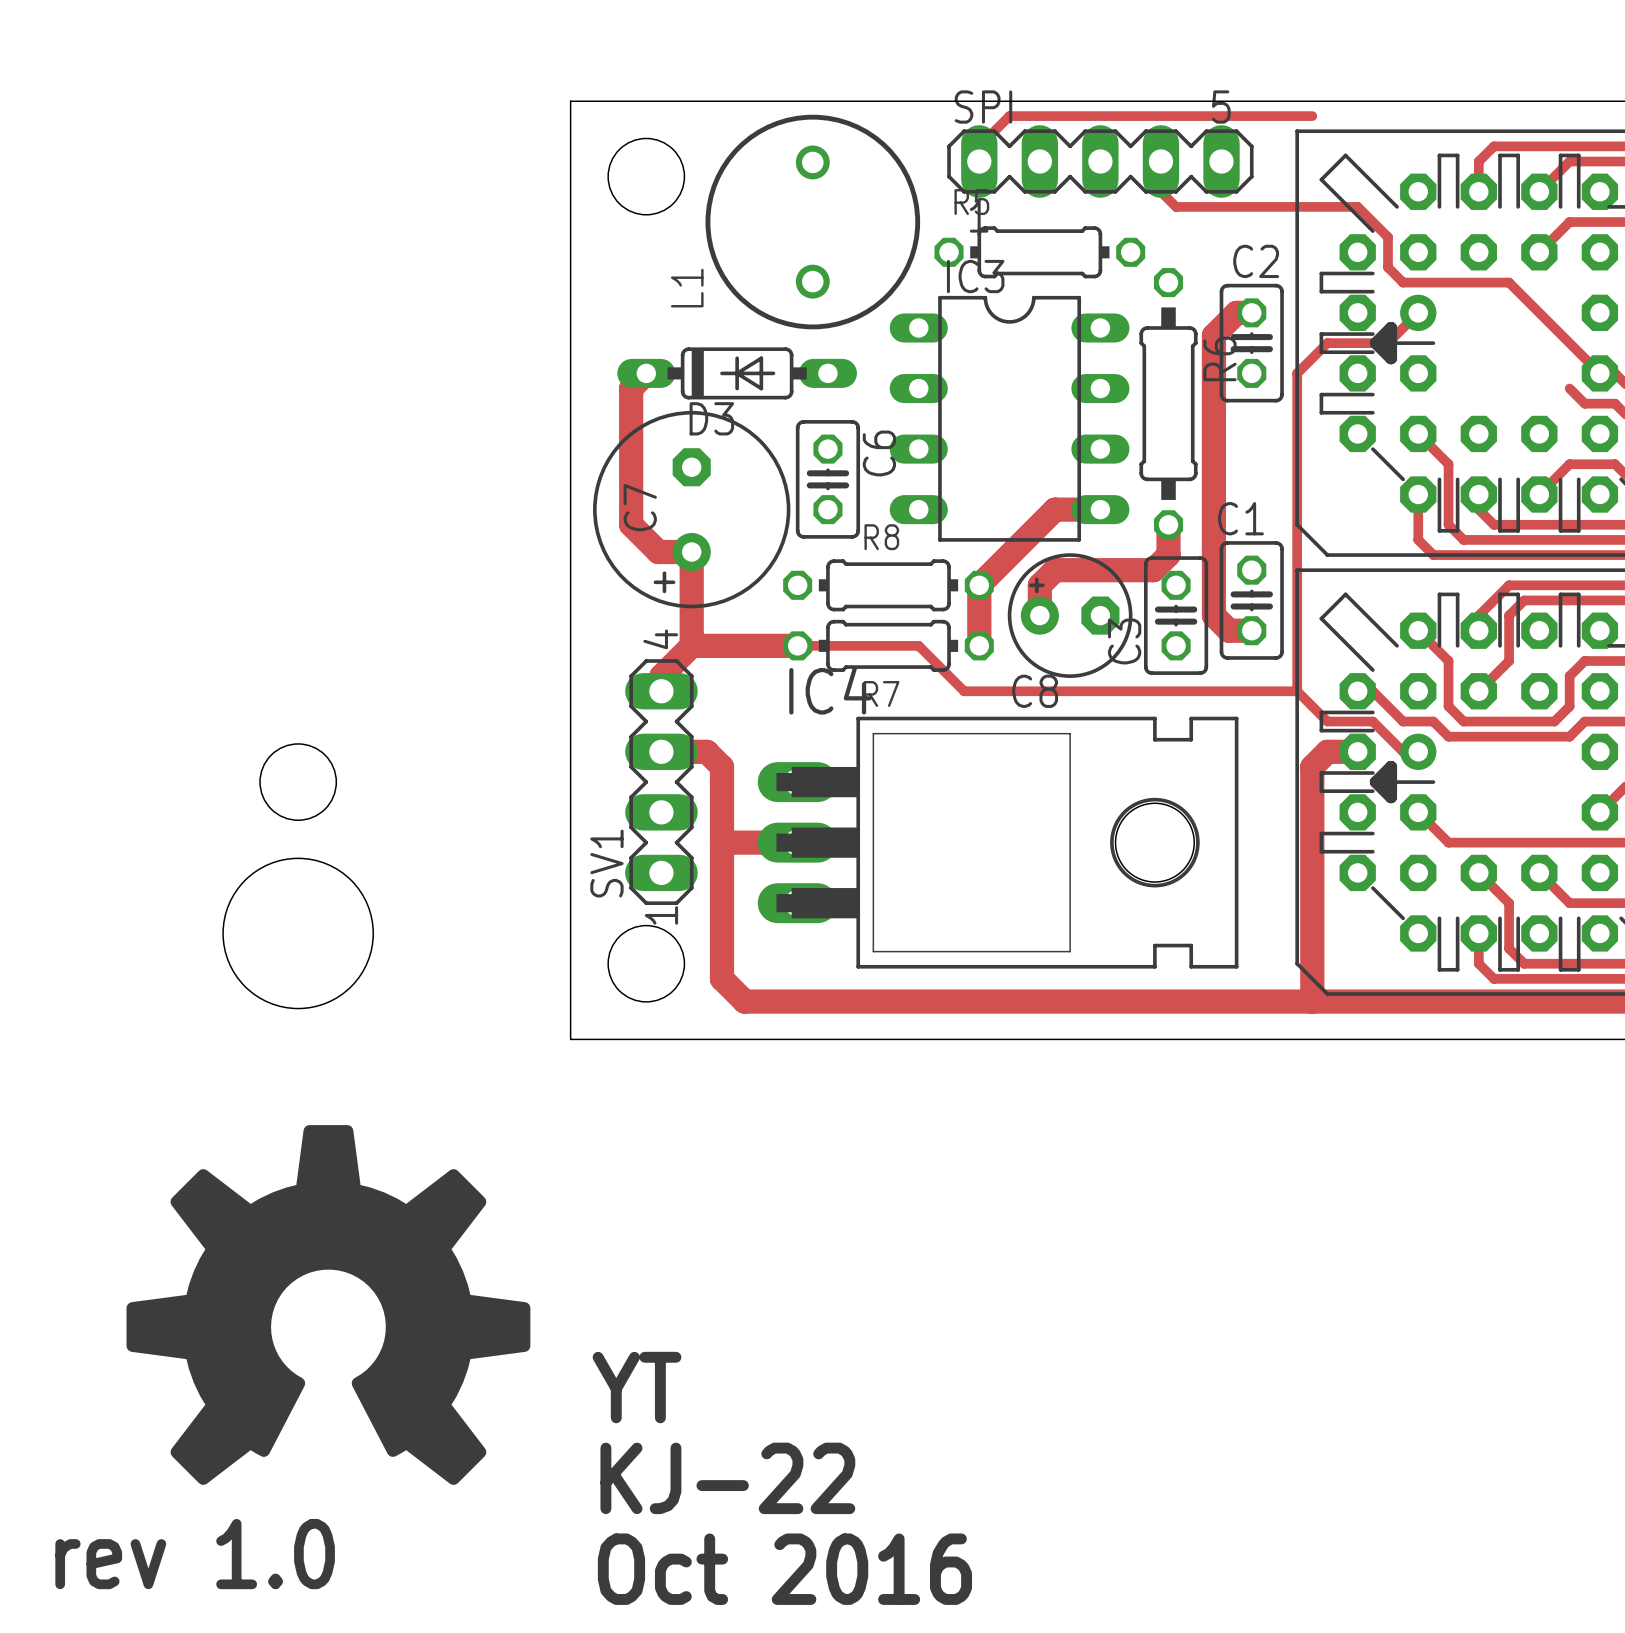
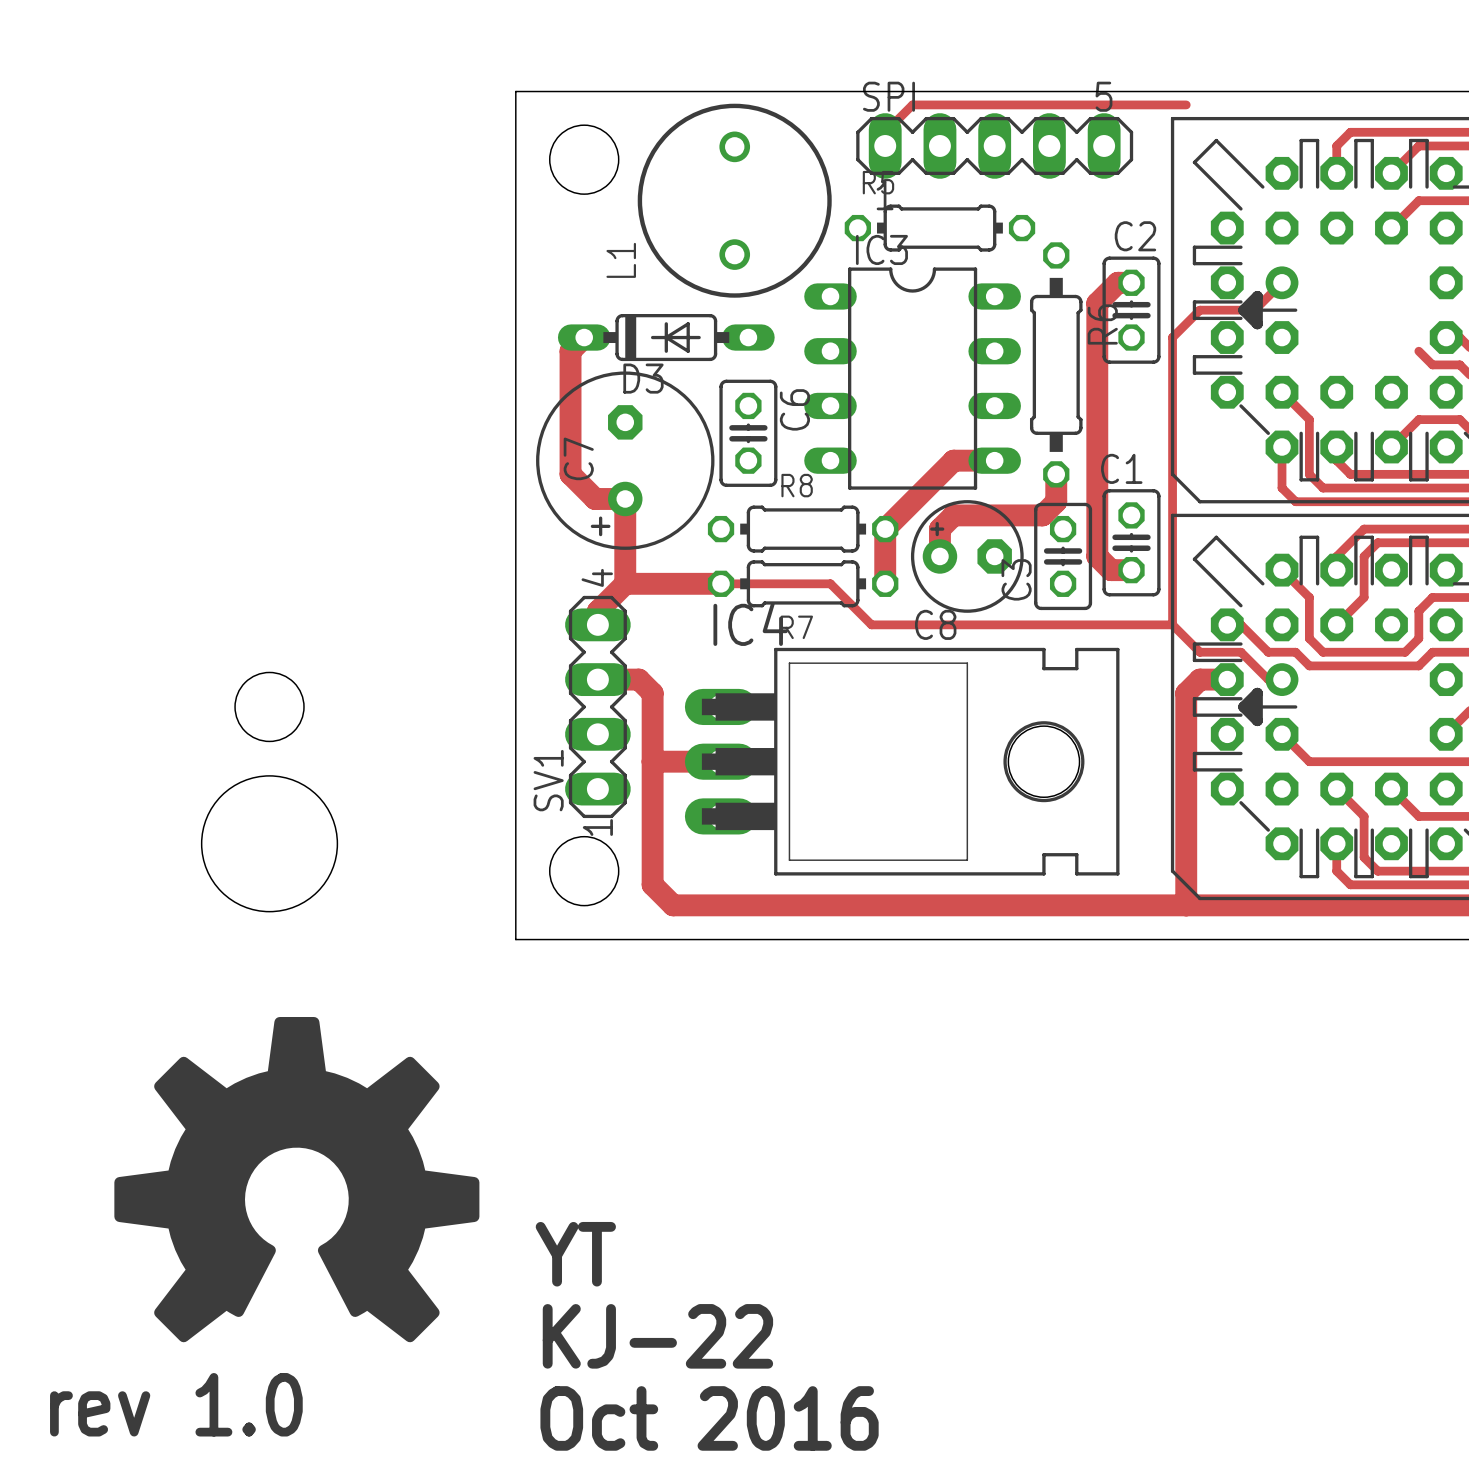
track: (1160, 161) (1160, 191) (1176, 206) (1357, 206) (1387, 237) (1387, 267) (1403, 282) (1509, 282) (1599, 373) -> none

